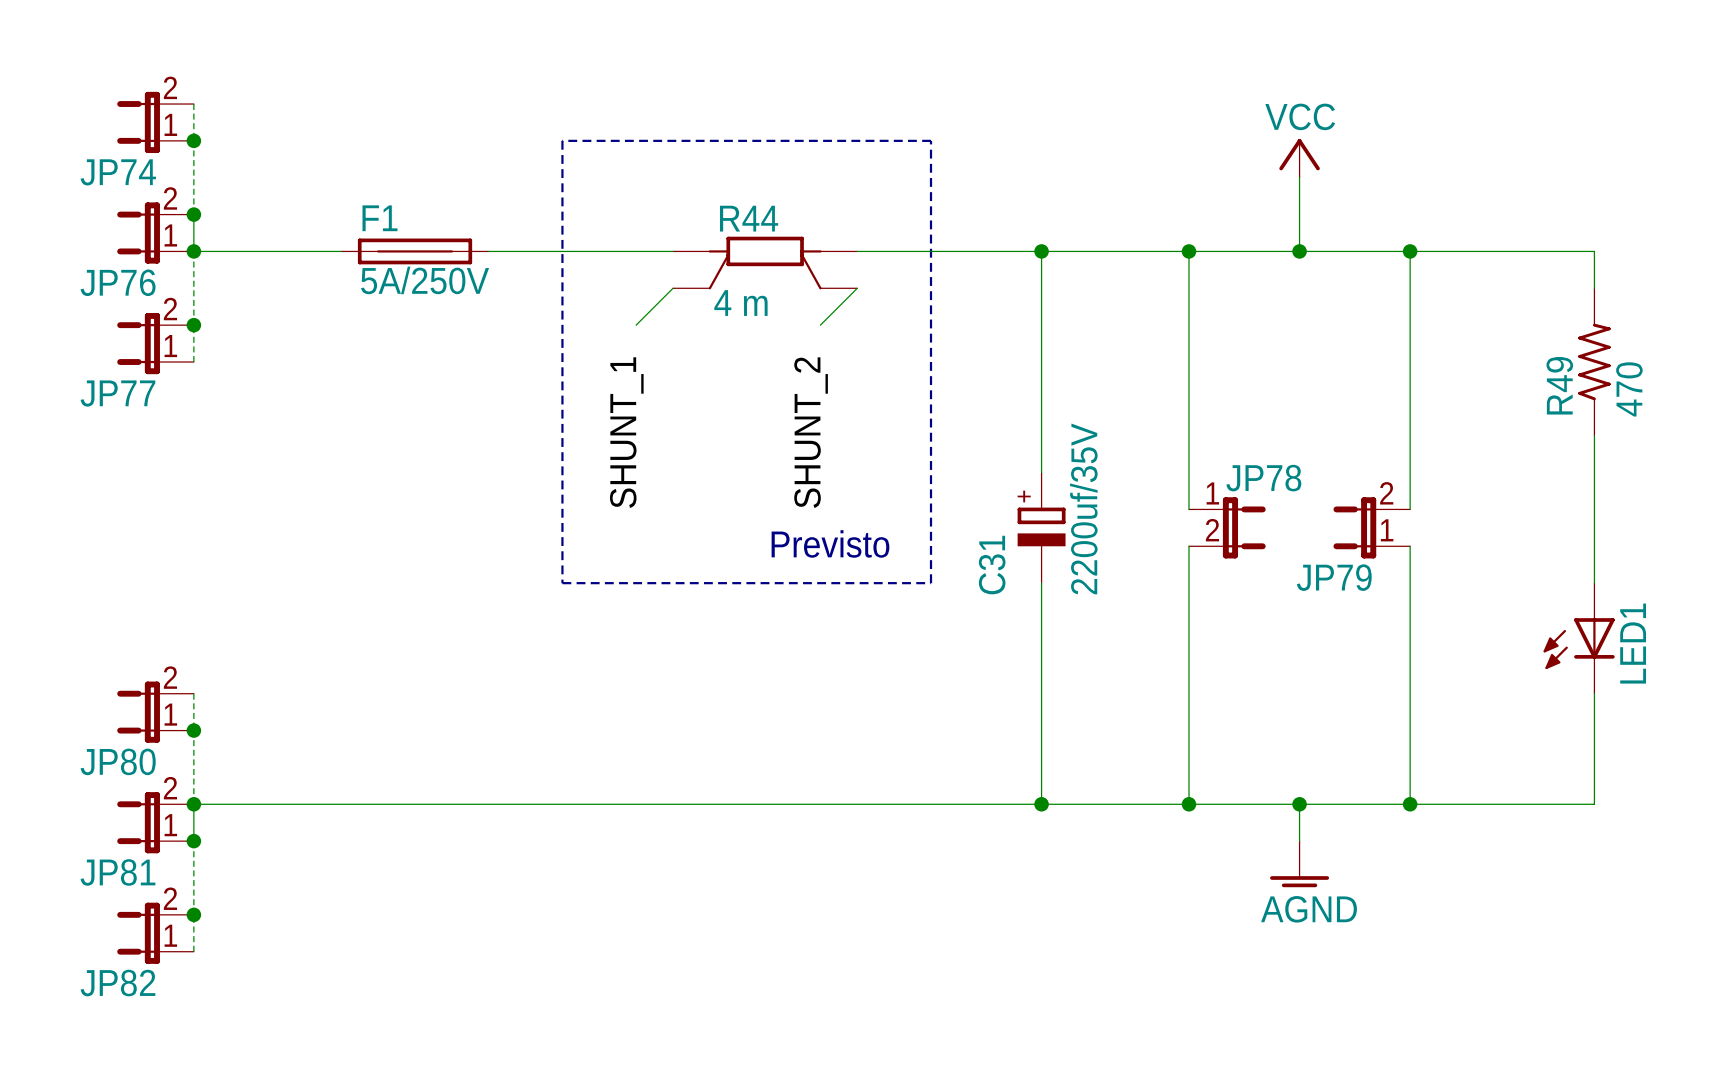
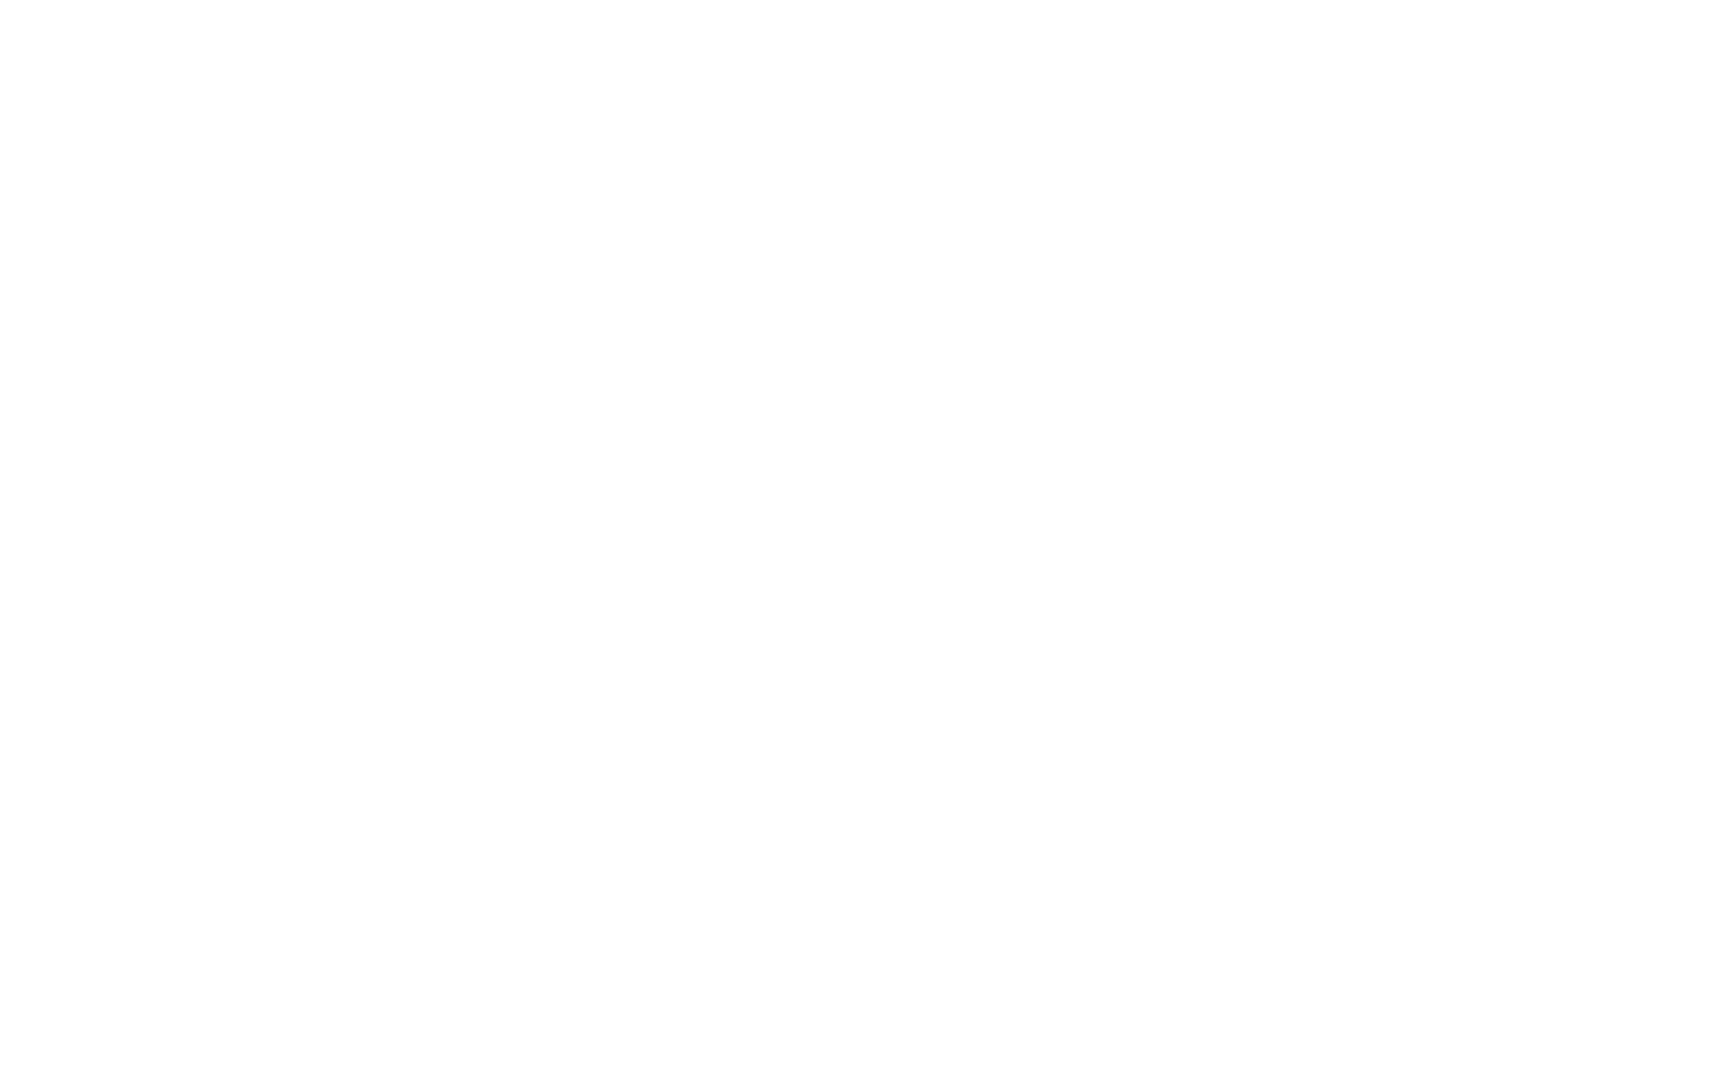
wire: (193, 104) (193, 251) -> none
JP74: (155, 122) -> none
junction: (193, 140) -> none
line: (562, 140) (562, 583) (931, 583) (931, 140) (562, 140) -> none
power symbol: VCC (1299, 158) -> none
wire: (1299, 177) (1299, 251) -> none
junction: (193, 214) -> none
JP76: (155, 233) -> none
wire: (193, 251) (193, 362) -> none
wire: (193, 251) (341, 251) -> none
junction: (193, 251) -> none
F1: 5A/250V (415, 251) -> none
wire: (488, 251) (673, 251) -> none
wire: (857, 251) (1594, 251) (1594, 288) -> none
wire: (1041, 251) (1041, 472) -> none
junction: (1041, 251) -> none
wire: (1189, 251) (1189, 509) -> none
junction: (1189, 251) -> none
junction: (1299, 251) -> none
wire: (1410, 251) (1410, 509) -> none
junction: (1410, 251) -> none
R44: 4 m (765, 263) -> none
wire: (673, 288) (636, 325) -> none
wire: (857, 288) (820, 325) -> none
junction: (193, 325) -> none
JP77: (155, 343) -> none
R49: 470 (1594, 362) -> none
label: SHUNT_1 (626, 432) -> none
label: SHUNT_2 (811, 432) -> none
wire: (1594, 435) (1594, 583) -> none
C31: 2200uf/35V (1041, 527) -> none
JP78: (1227, 527) -> none
JP79: (1371, 527) -> none
text: Previsto (830, 543) -> none
wire: (1189, 546) (1189, 804) -> none
wire: (1410, 546) (1410, 804) -> none
wire: (1041, 583) (1041, 804) -> none
LED1: (1579, 638) -> none
wire: (193, 693) (193, 804) -> none
wire: (1594, 693) (1594, 804) (193, 804) -> none
JP80: (155, 712) -> none
junction: (193, 730) -> none
wire: (193, 804) (193, 951) -> none
junction: (193, 804) -> none
junction: (1041, 804) -> none
junction: (1189, 804) -> none
wire: (1299, 804) (1299, 841) -> none
junction: (1299, 804) -> none
junction: (1410, 804) -> none
JP81: (155, 822) -> none
junction: (193, 841) -> none
power symbol: AGND (1299, 864) -> none
junction: (193, 914) -> none
JP82: (155, 933) -> none

